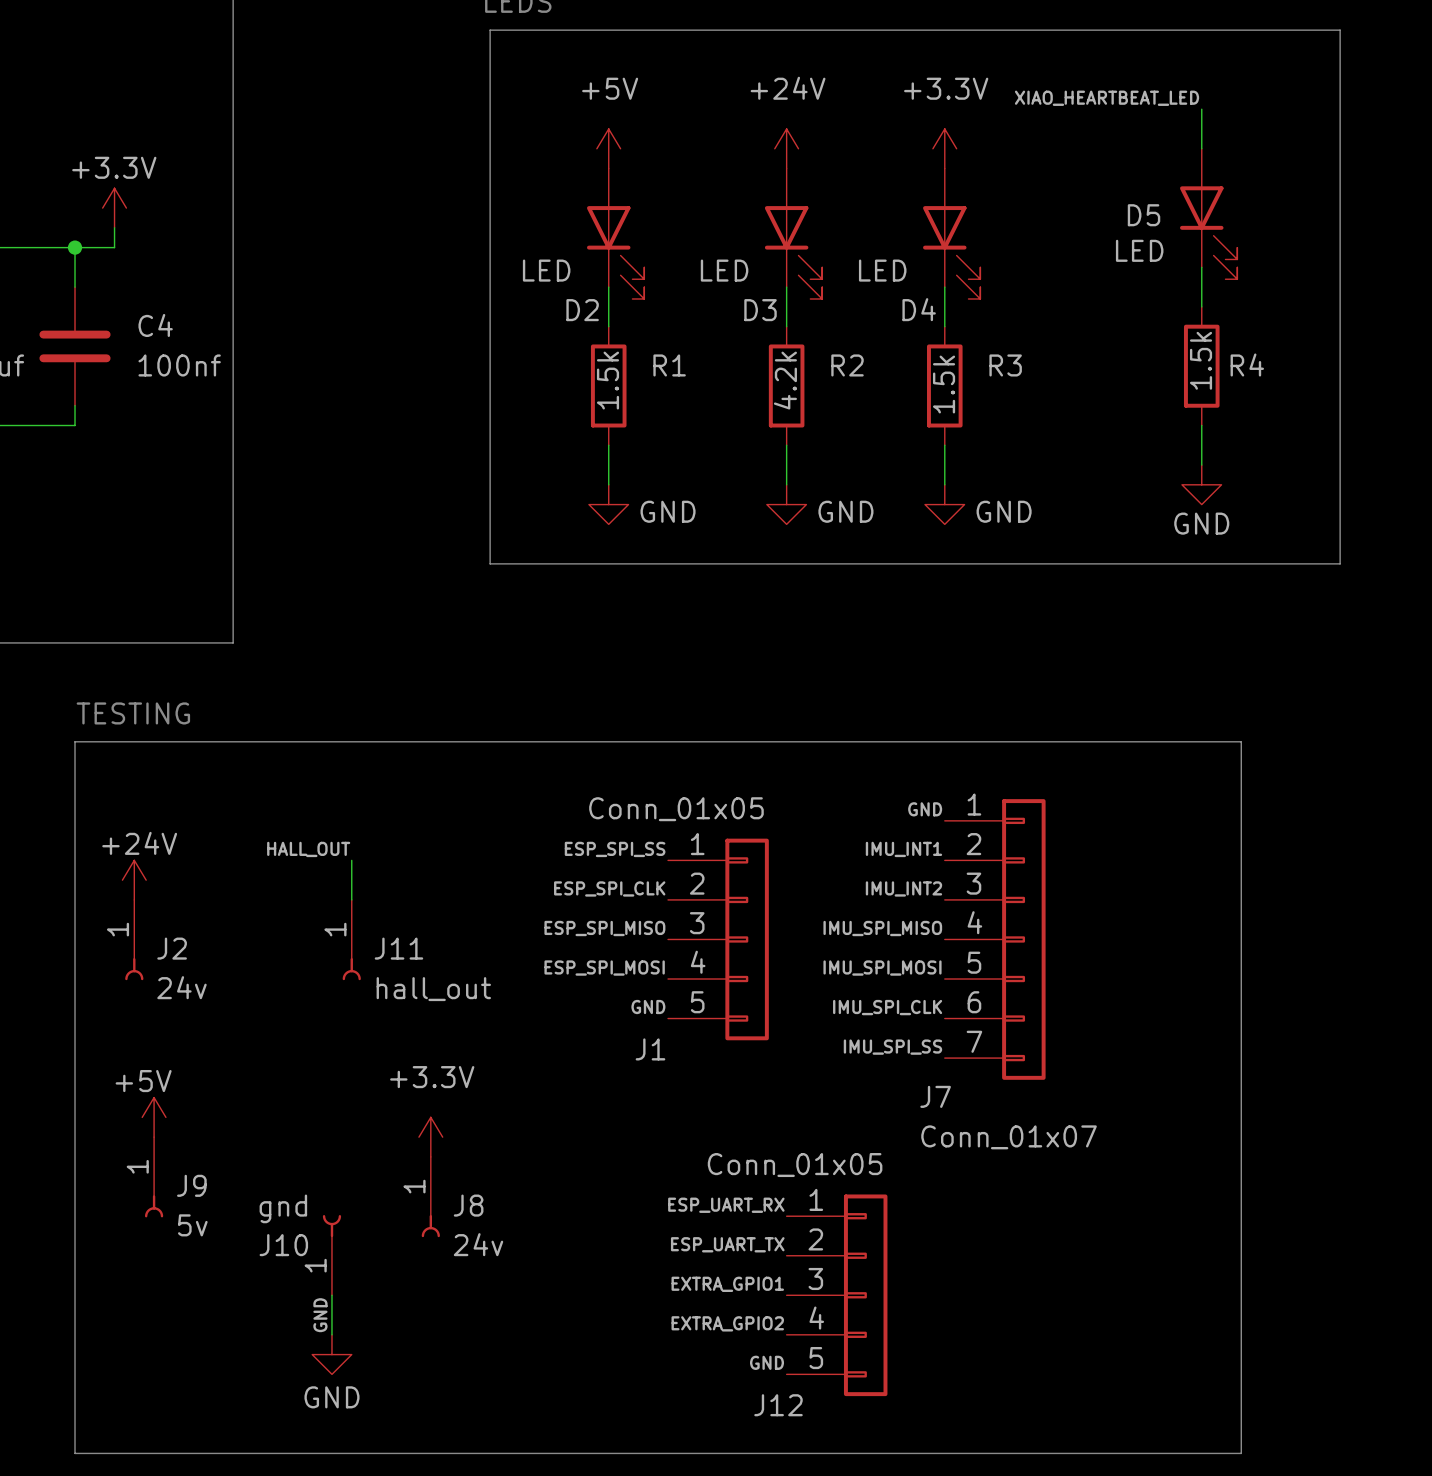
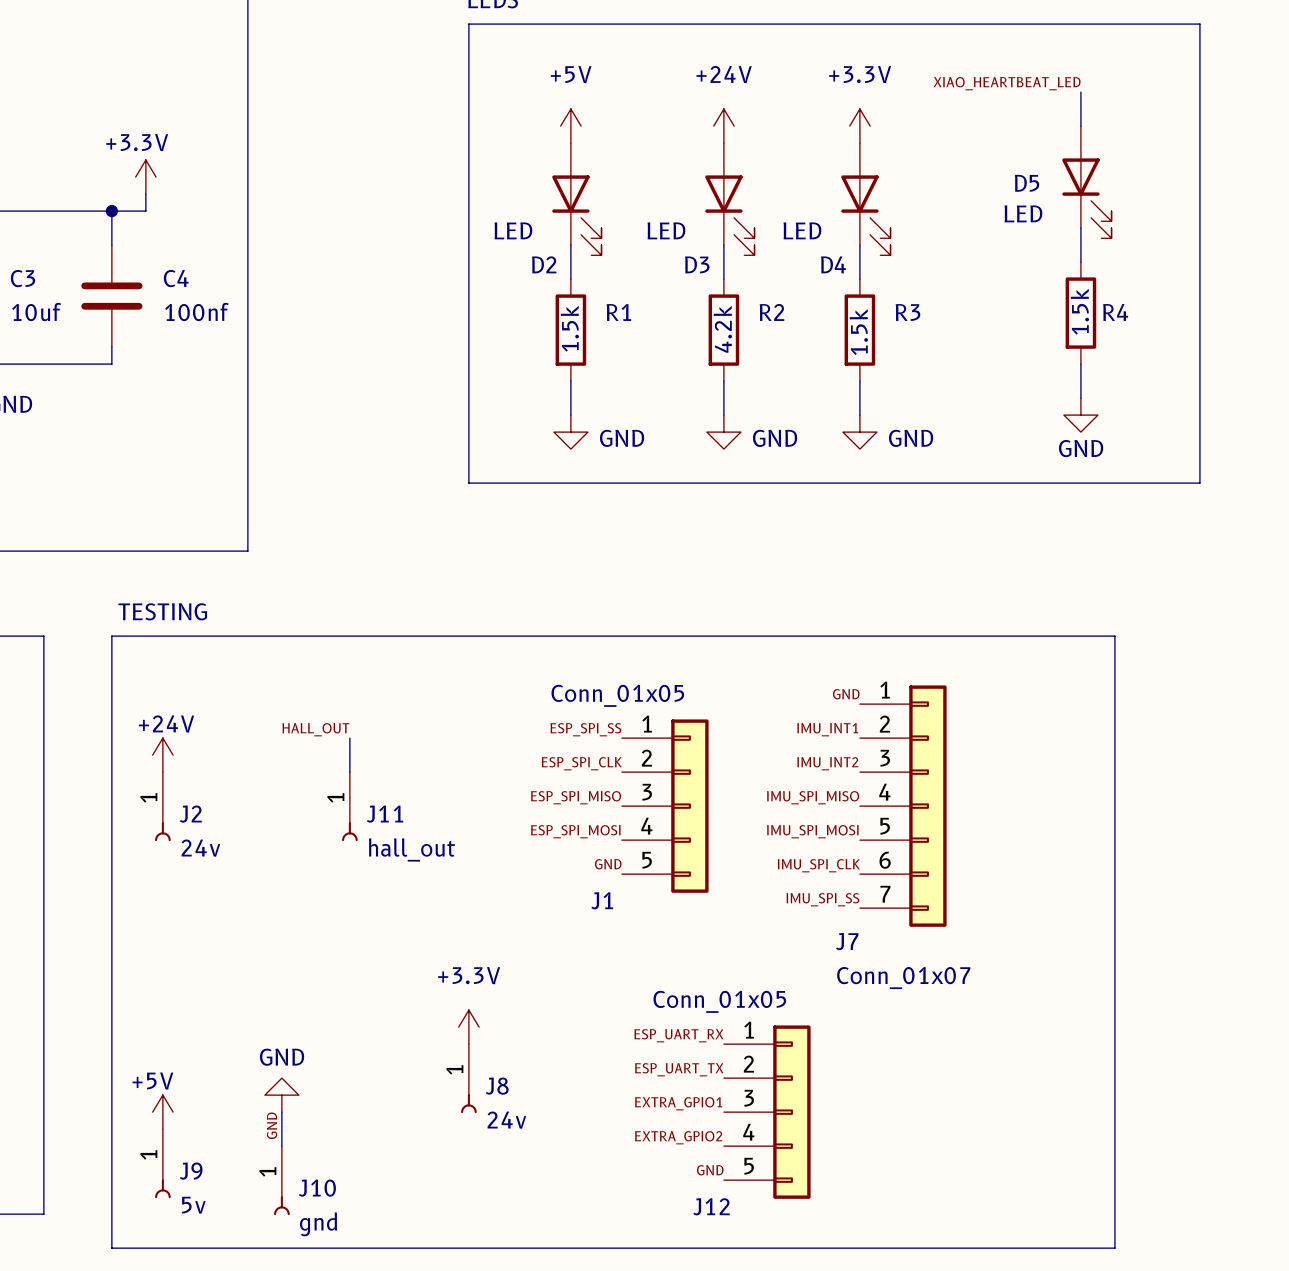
power symbol position: +5V (154, 1117) -> +5V (162, 1112)
power symbol position: +3.3V (430, 1137) -> +3.3V (468, 1027)
J9 position: (154, 1177) -> (162, 1163)
J8 position: (430, 1197) -> (468, 1078)
J10 rotation: 0° (331, 1226) -> 180° (281, 1205)
J10 position: (331, 1255) -> (281, 1180)
wire: (331, 1295) (331, 1334) -> (281, 1112) (281, 1146)
label position: GND (320, 1315) -> GND (272, 1125)
power symbol rotation: 0° (331, 1354) -> 180° (281, 1095)
power symbol position: GND (331, 1354) -> GND (281, 1095)

